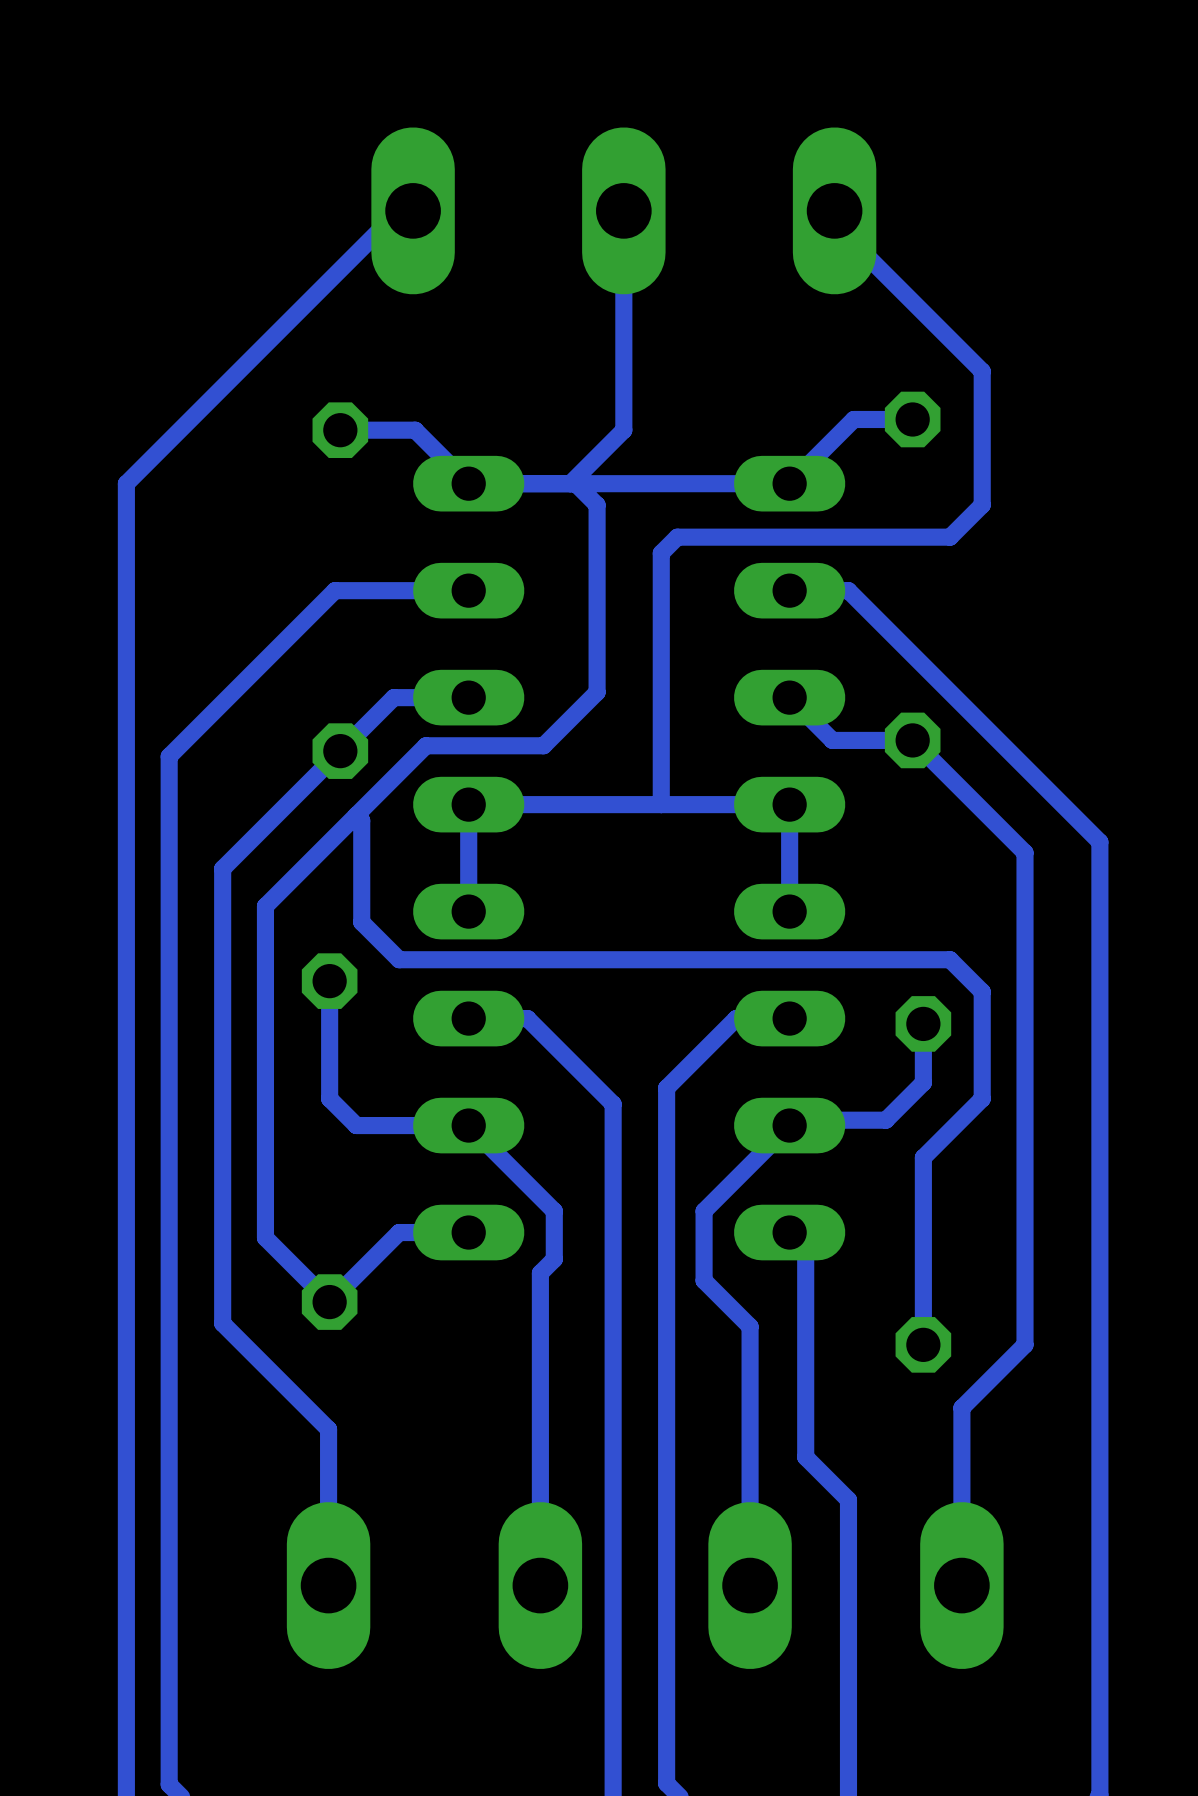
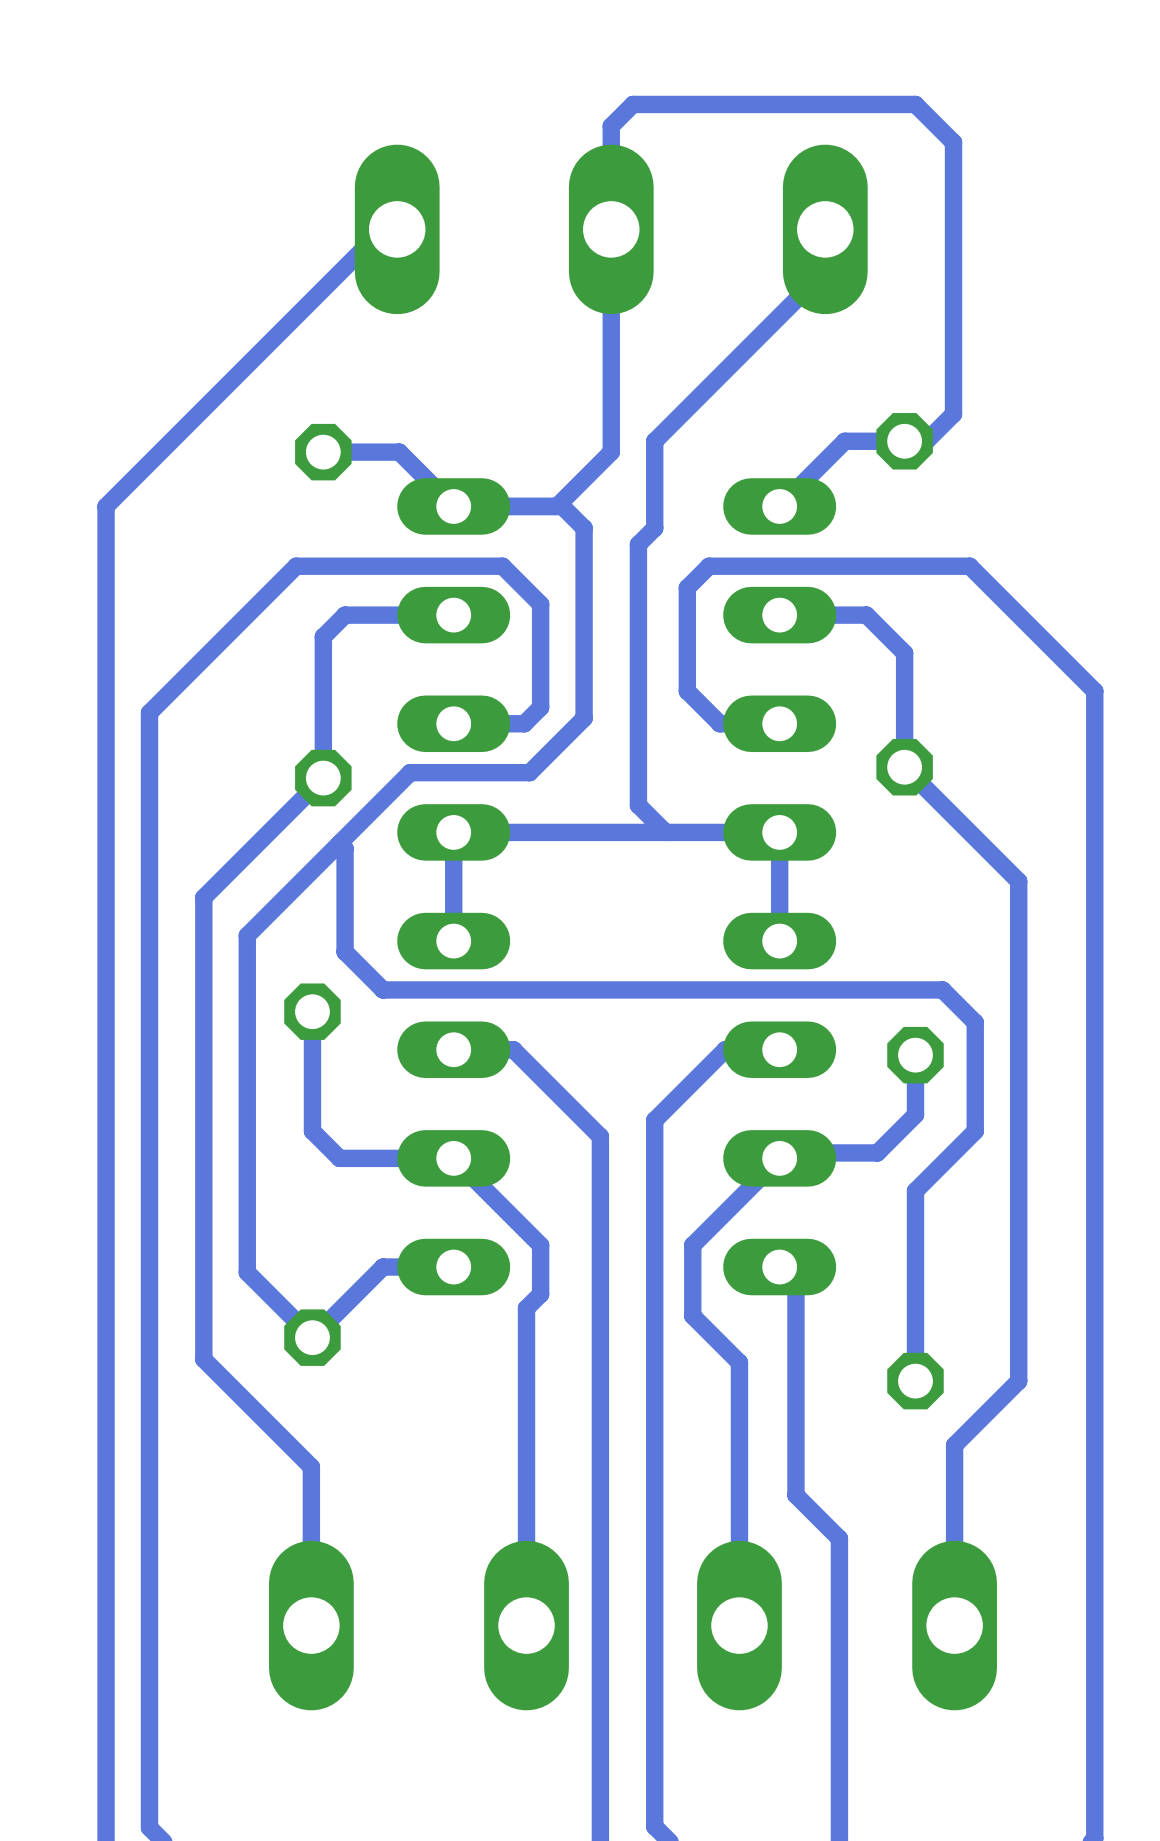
track: none -> (611, 229) (611, 126) (632, 104) (915, 104) (953, 142) (953, 414) (926, 441) (904, 441)
track: (834, 223) (982, 371) (982, 505) (950, 537) (677, 537) (661, 553) (661, 804) -> (825, 242) (825, 270) (654, 441) (654, 528) (638, 544) (638, 805) (665, 832)
track: (789, 483) (575, 483) -> none
track: (361, 590) (334, 590) (169, 756) -> (453, 723) (524, 723) (540, 707) (540, 604) (502, 566) (296, 566) (149, 712) (149, 783)
track: (848, 590) (1099, 842) -> (779, 723) (719, 723) (687, 691) (687, 587) (709, 566) (969, 566) (1094, 691) (1094, 870)
track: (468, 697) (393, 697) (340, 751) -> (345, 615) (323, 636) (323, 778)
track: (789, 697) (832, 740) (912, 740) -> (839, 615) (866, 615) (904, 653) (904, 767)

